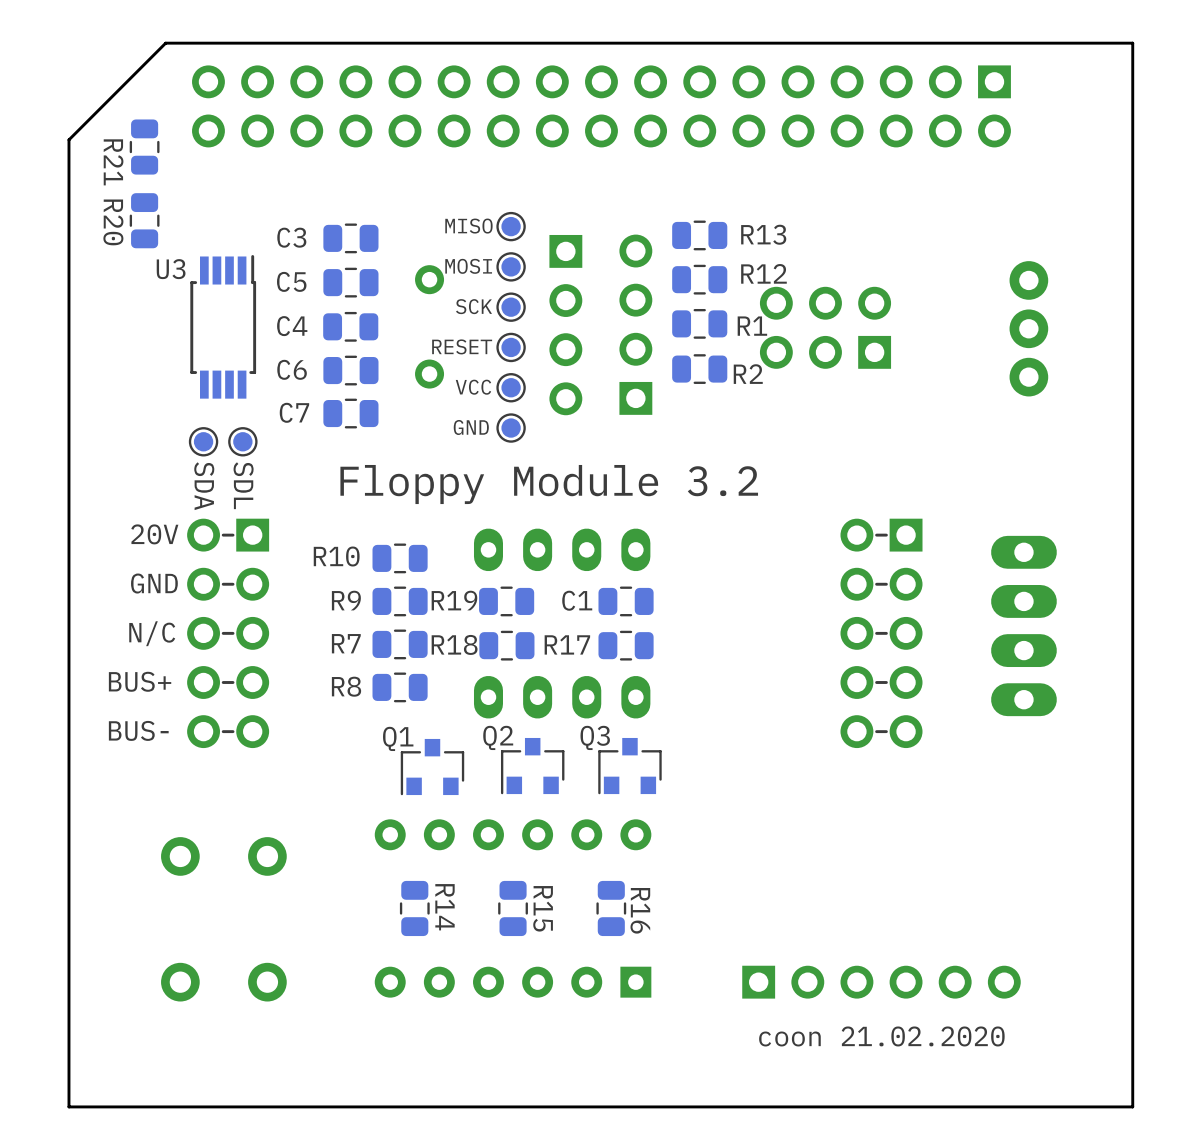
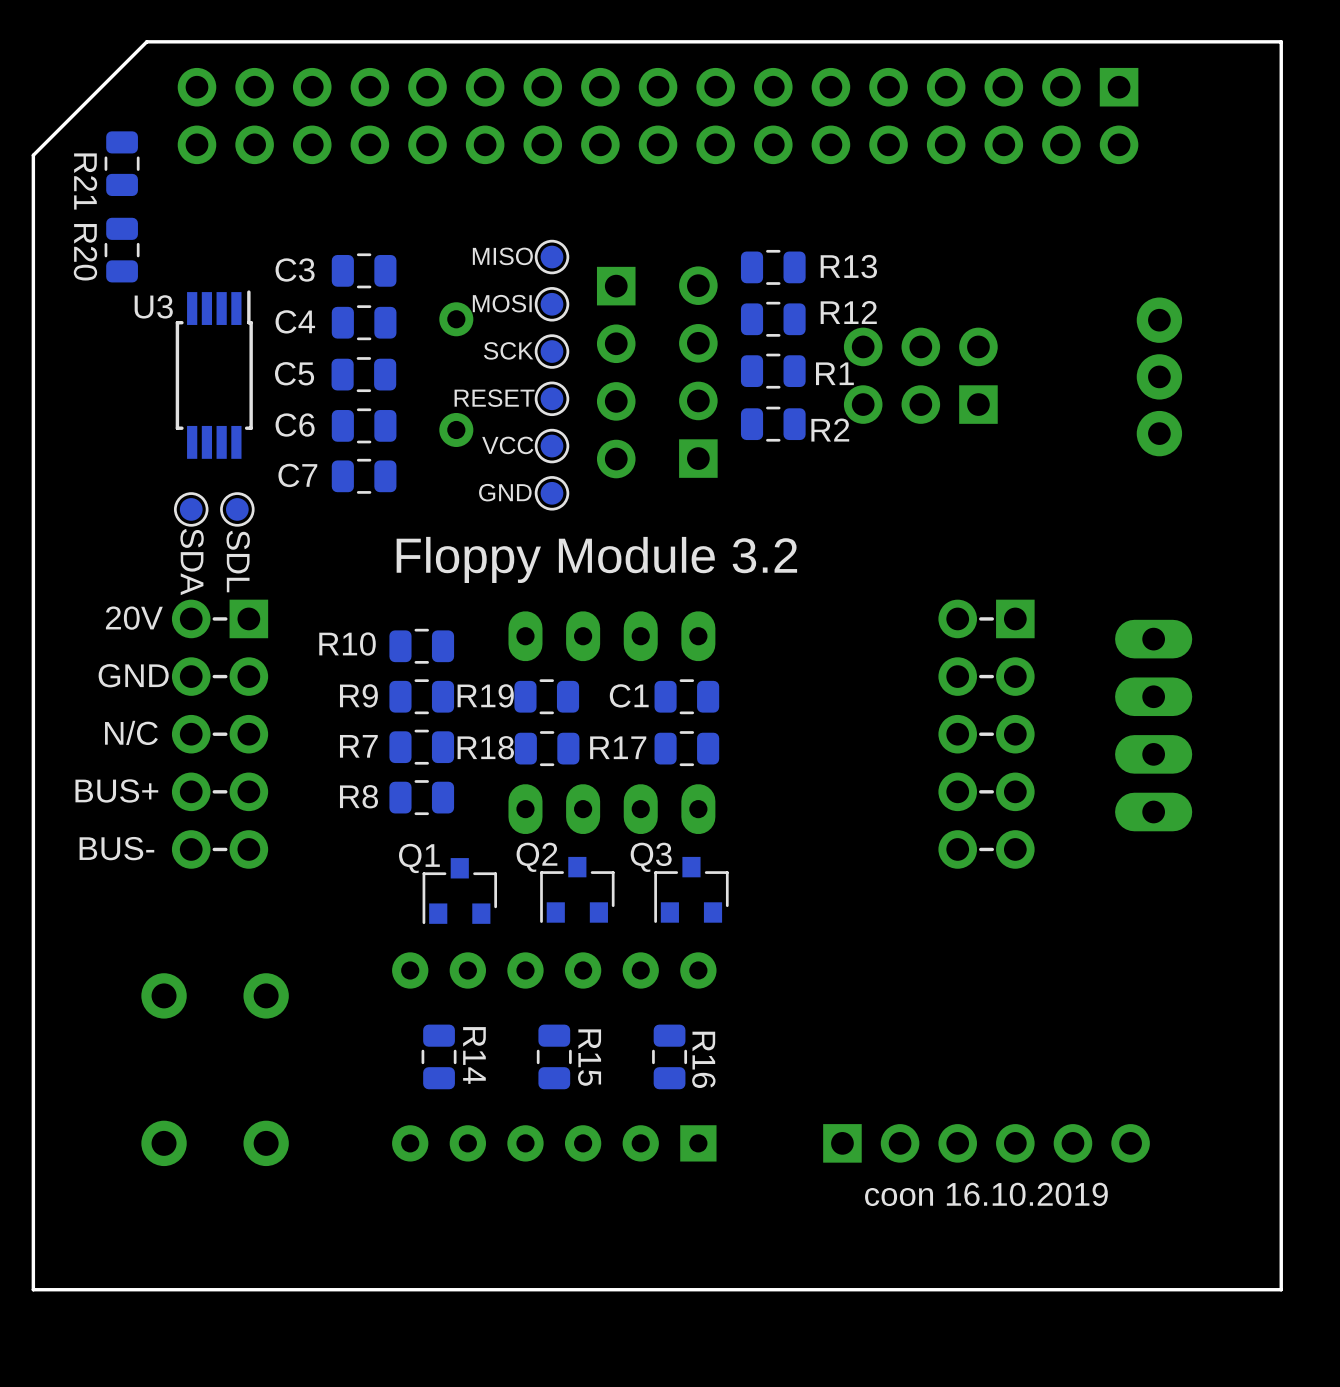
C5 name: C5 (291, 281) -> C4 (295, 321)
C4 name: C4 (292, 326) -> C5 (294, 373)
text: coon 21.02.2020 (881, 1036) -> coon 16.10.2019 (986, 1194)

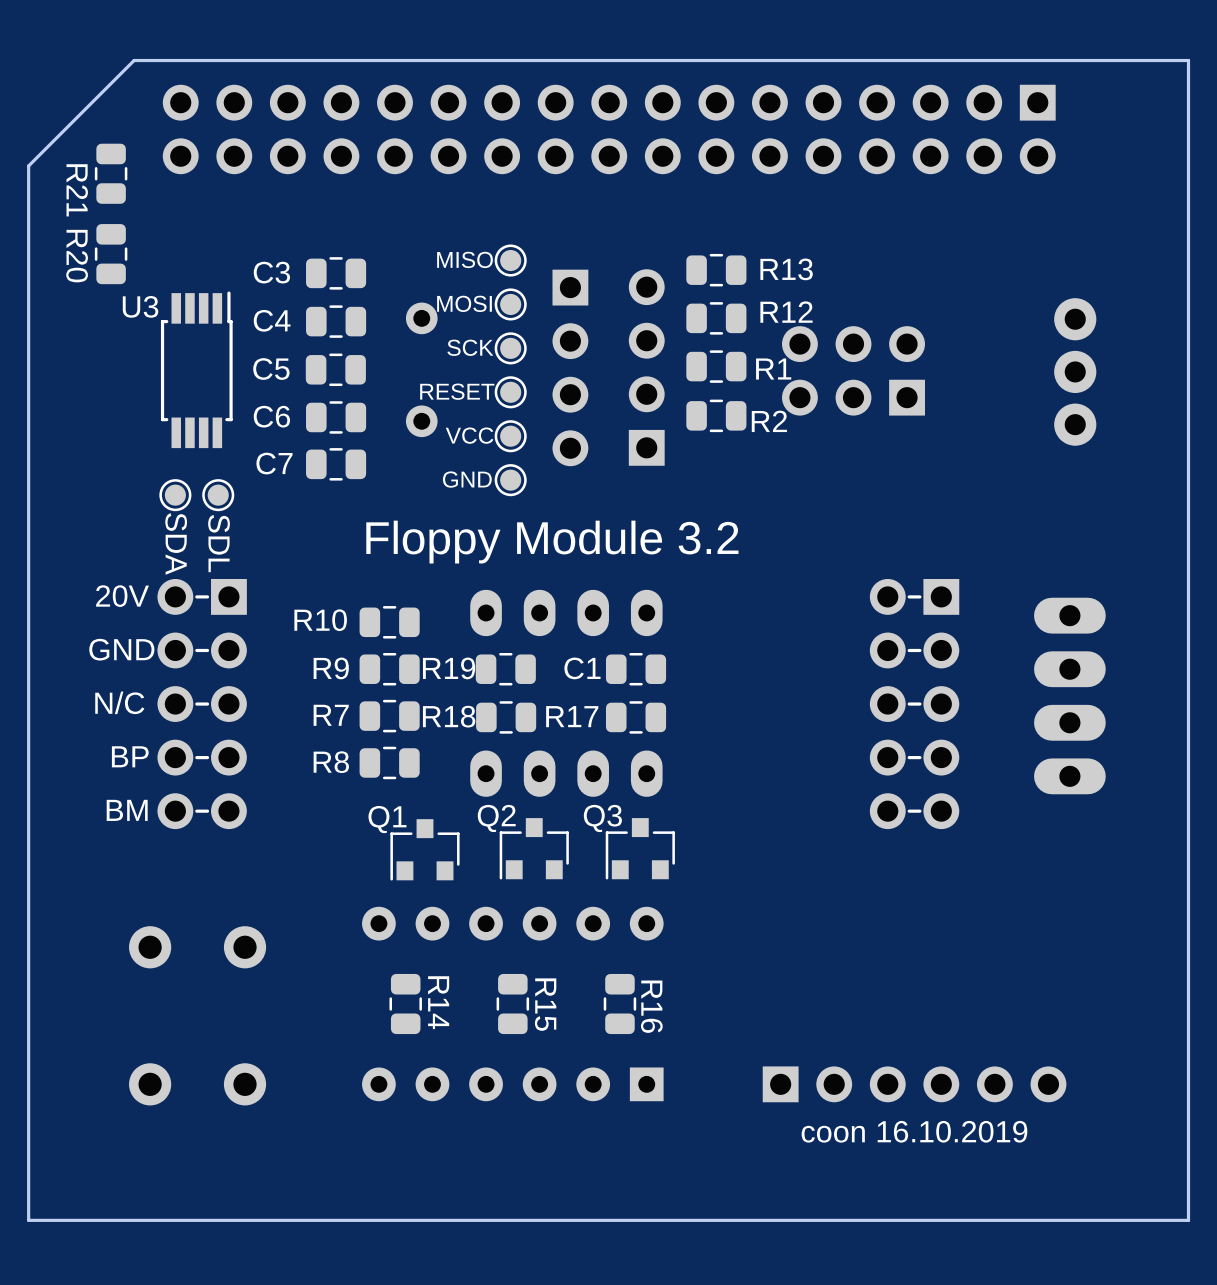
text: BUS+ (116, 790) -> none
text: none -> BP (130, 756)
text: BUS- (116, 848) -> none
text: none -> BM (127, 810)

